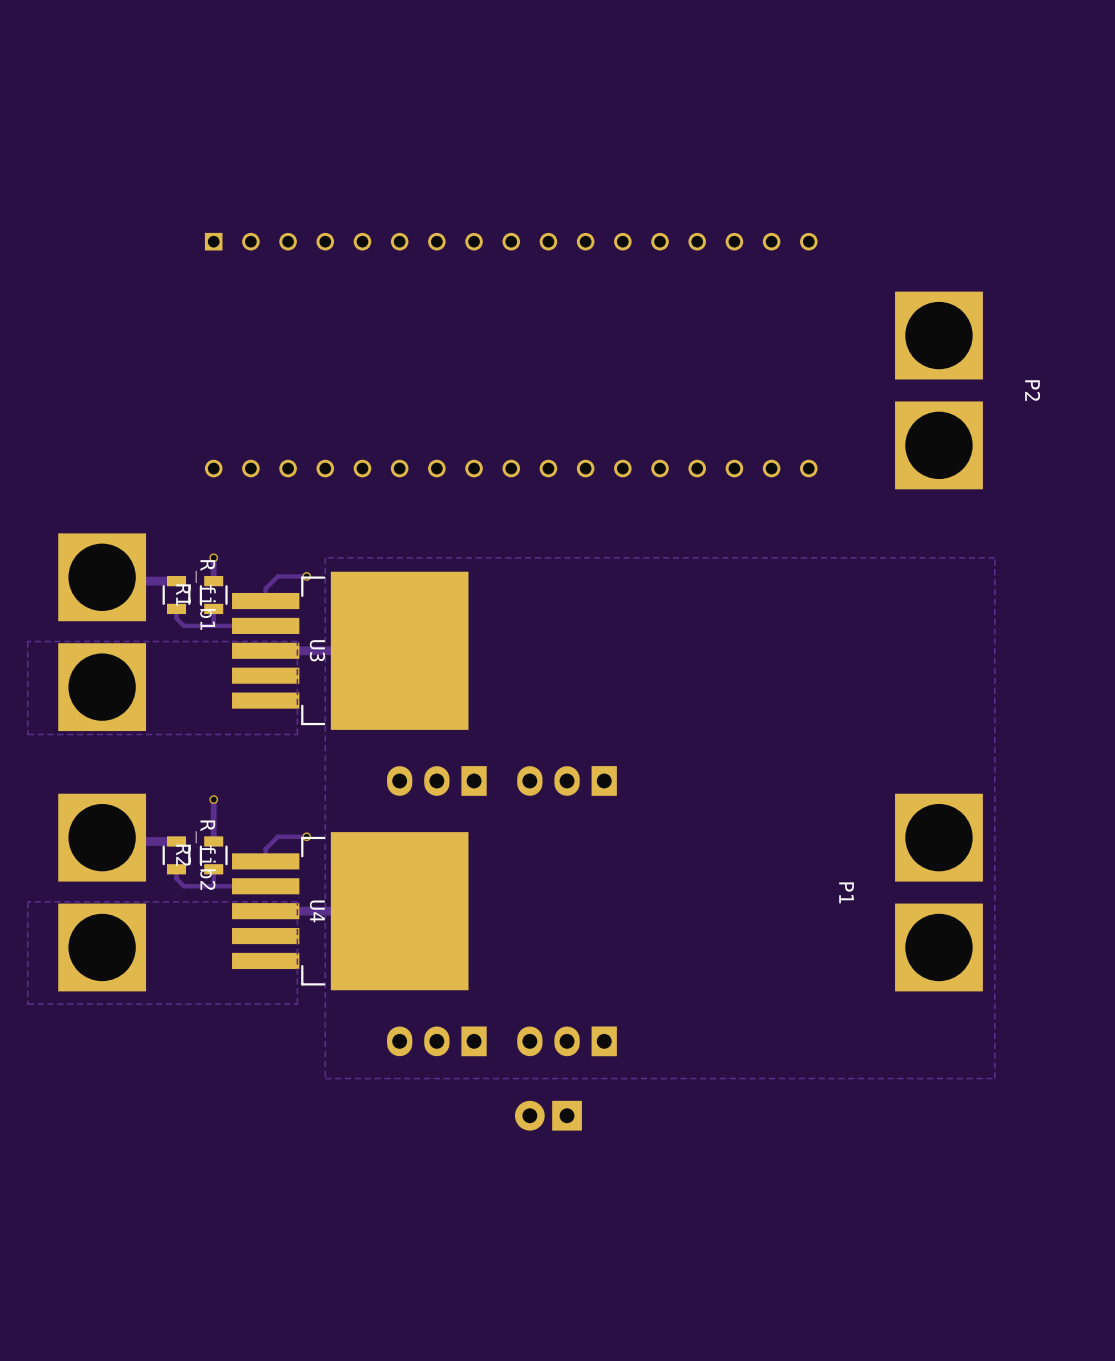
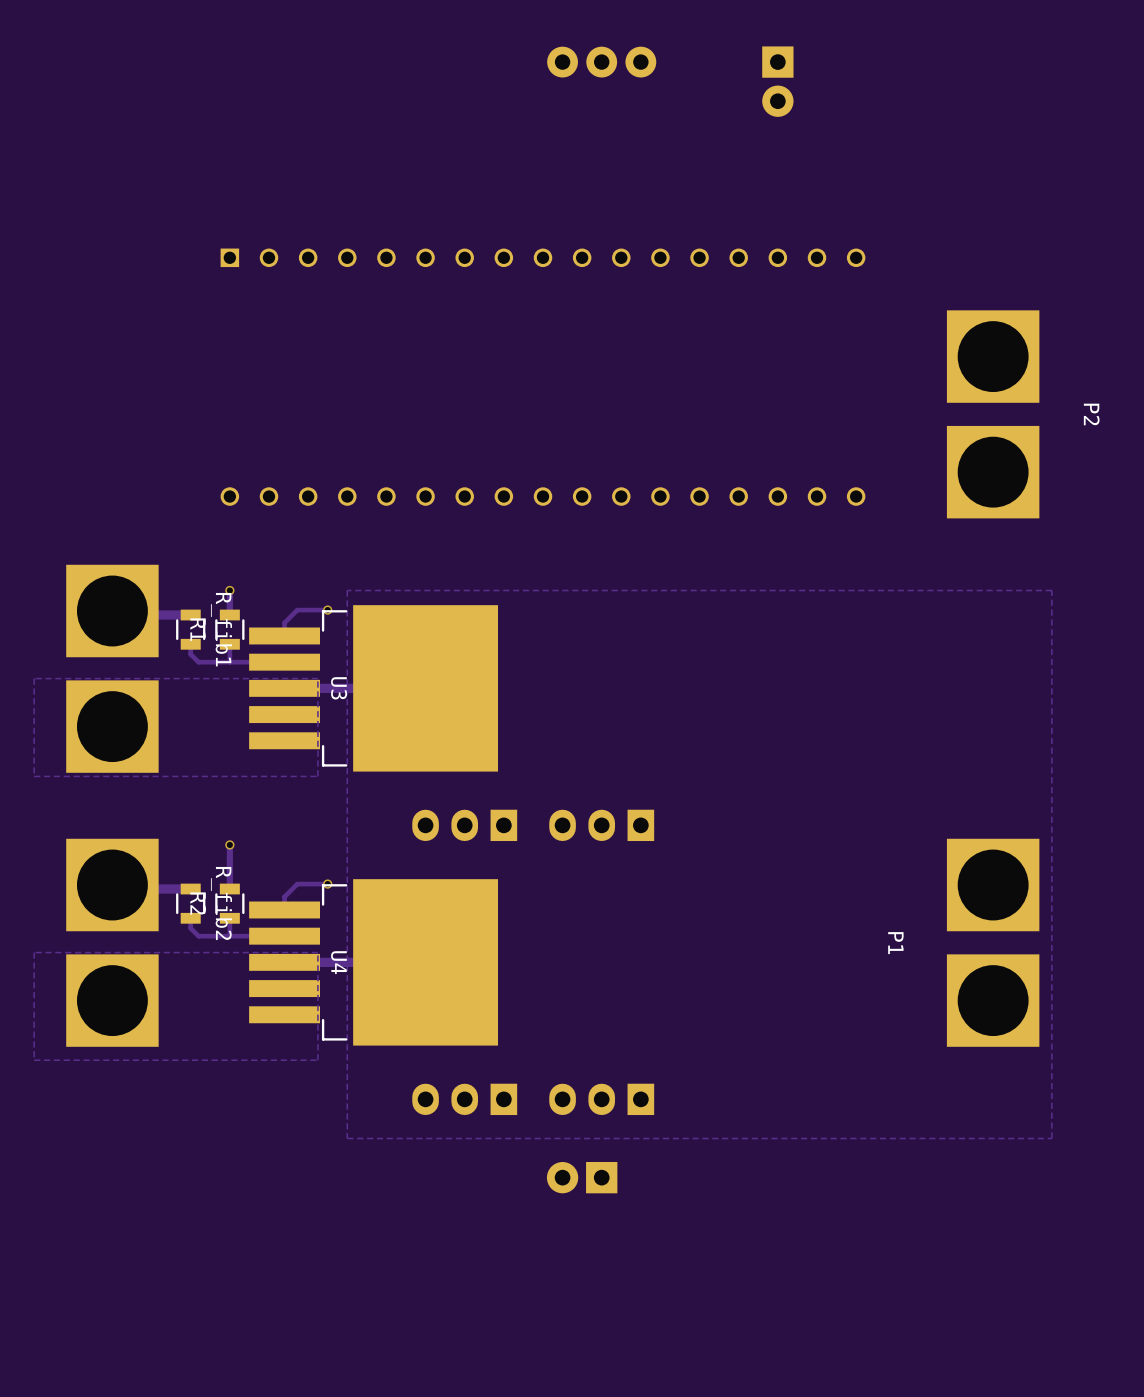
part: none -> (601, 62)
part: none -> (777, 81)

